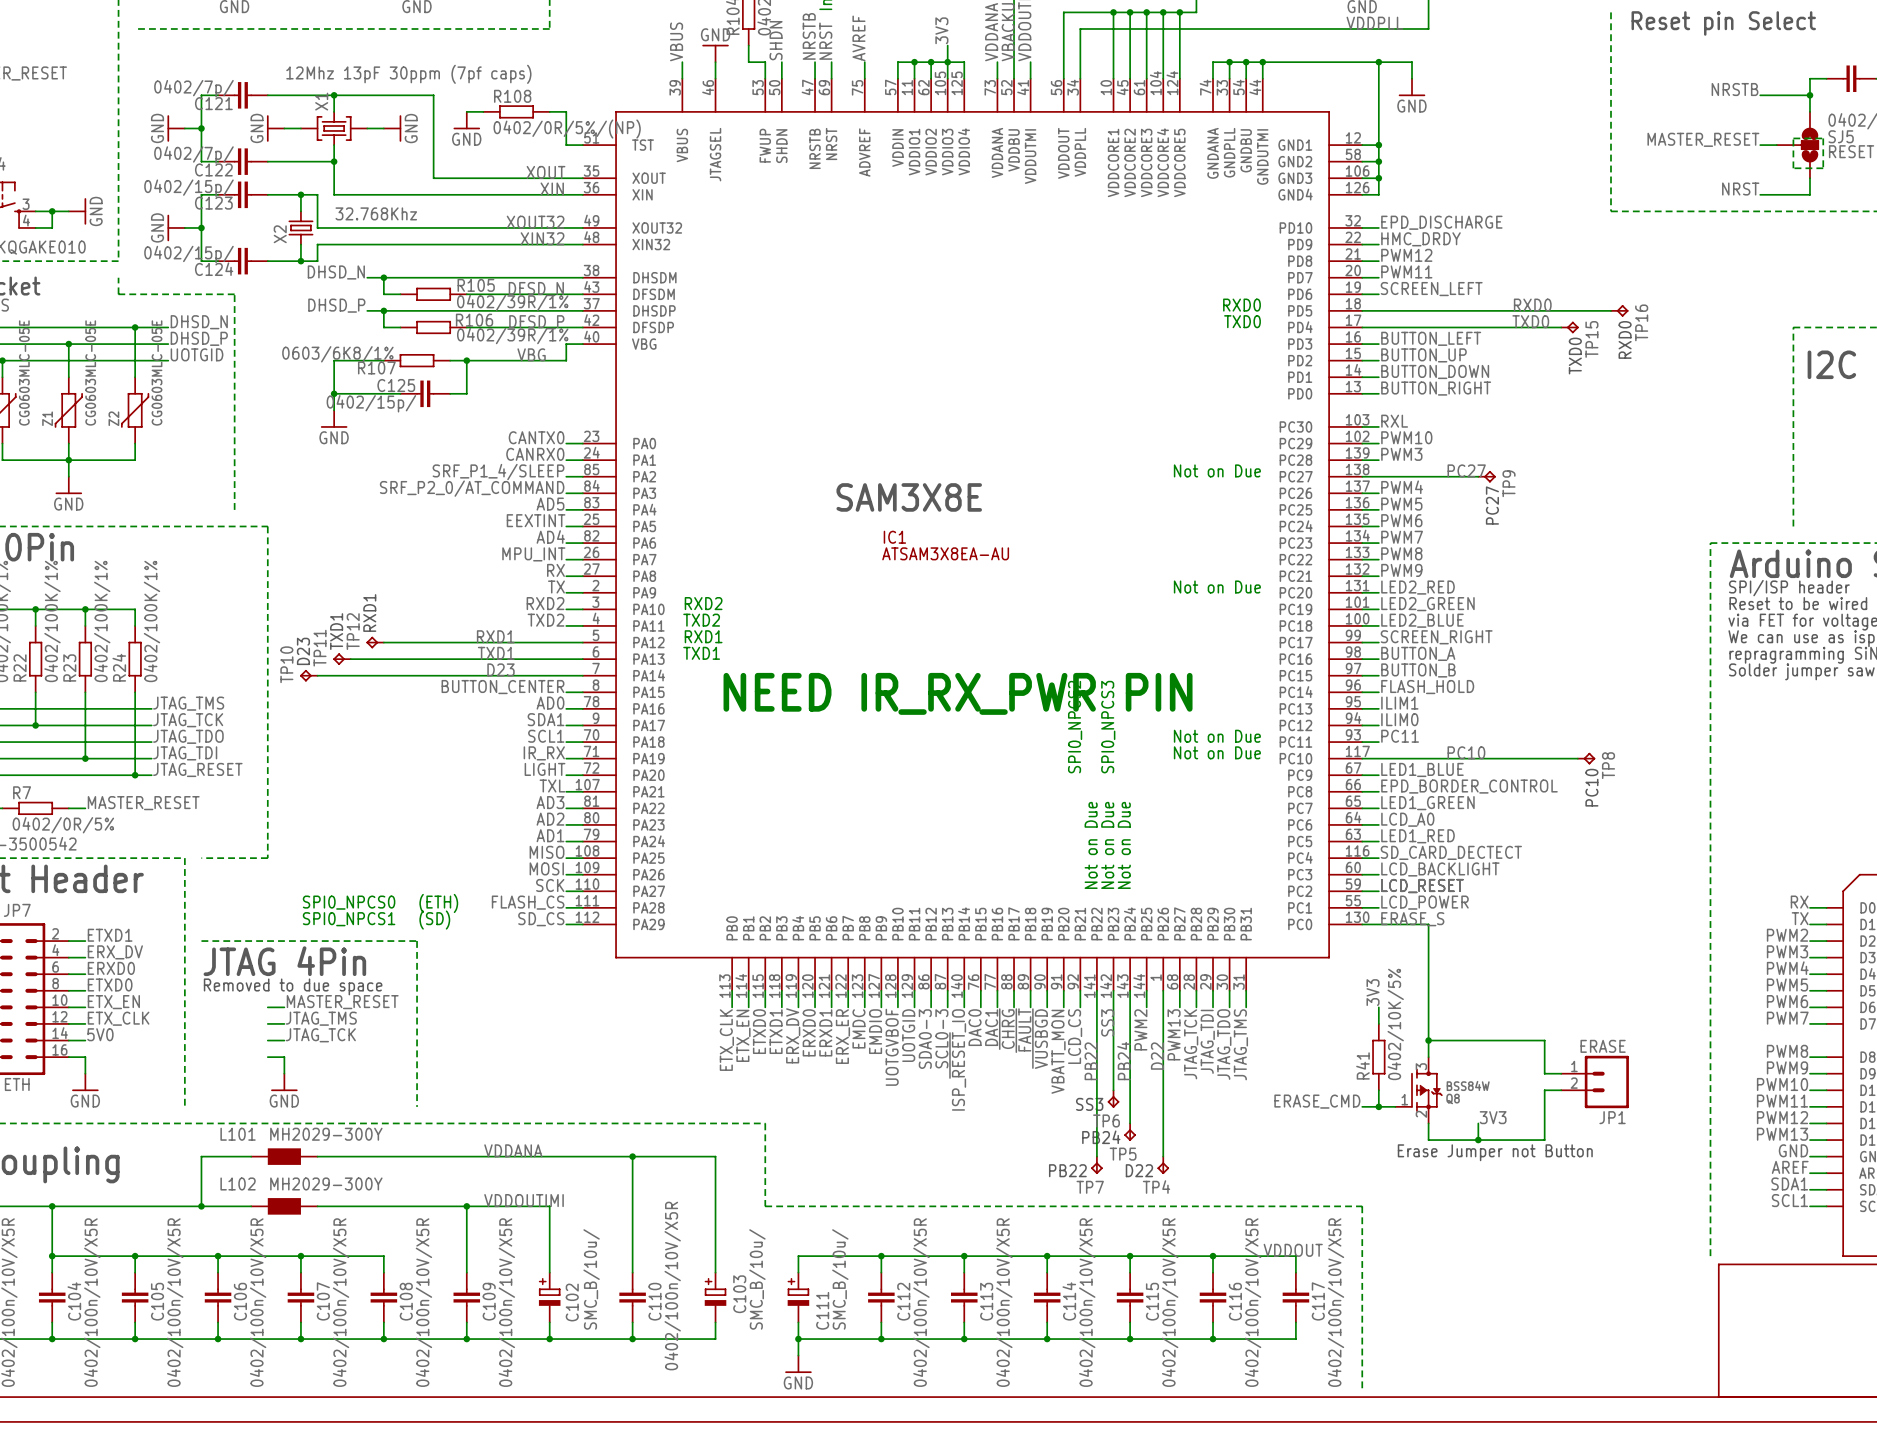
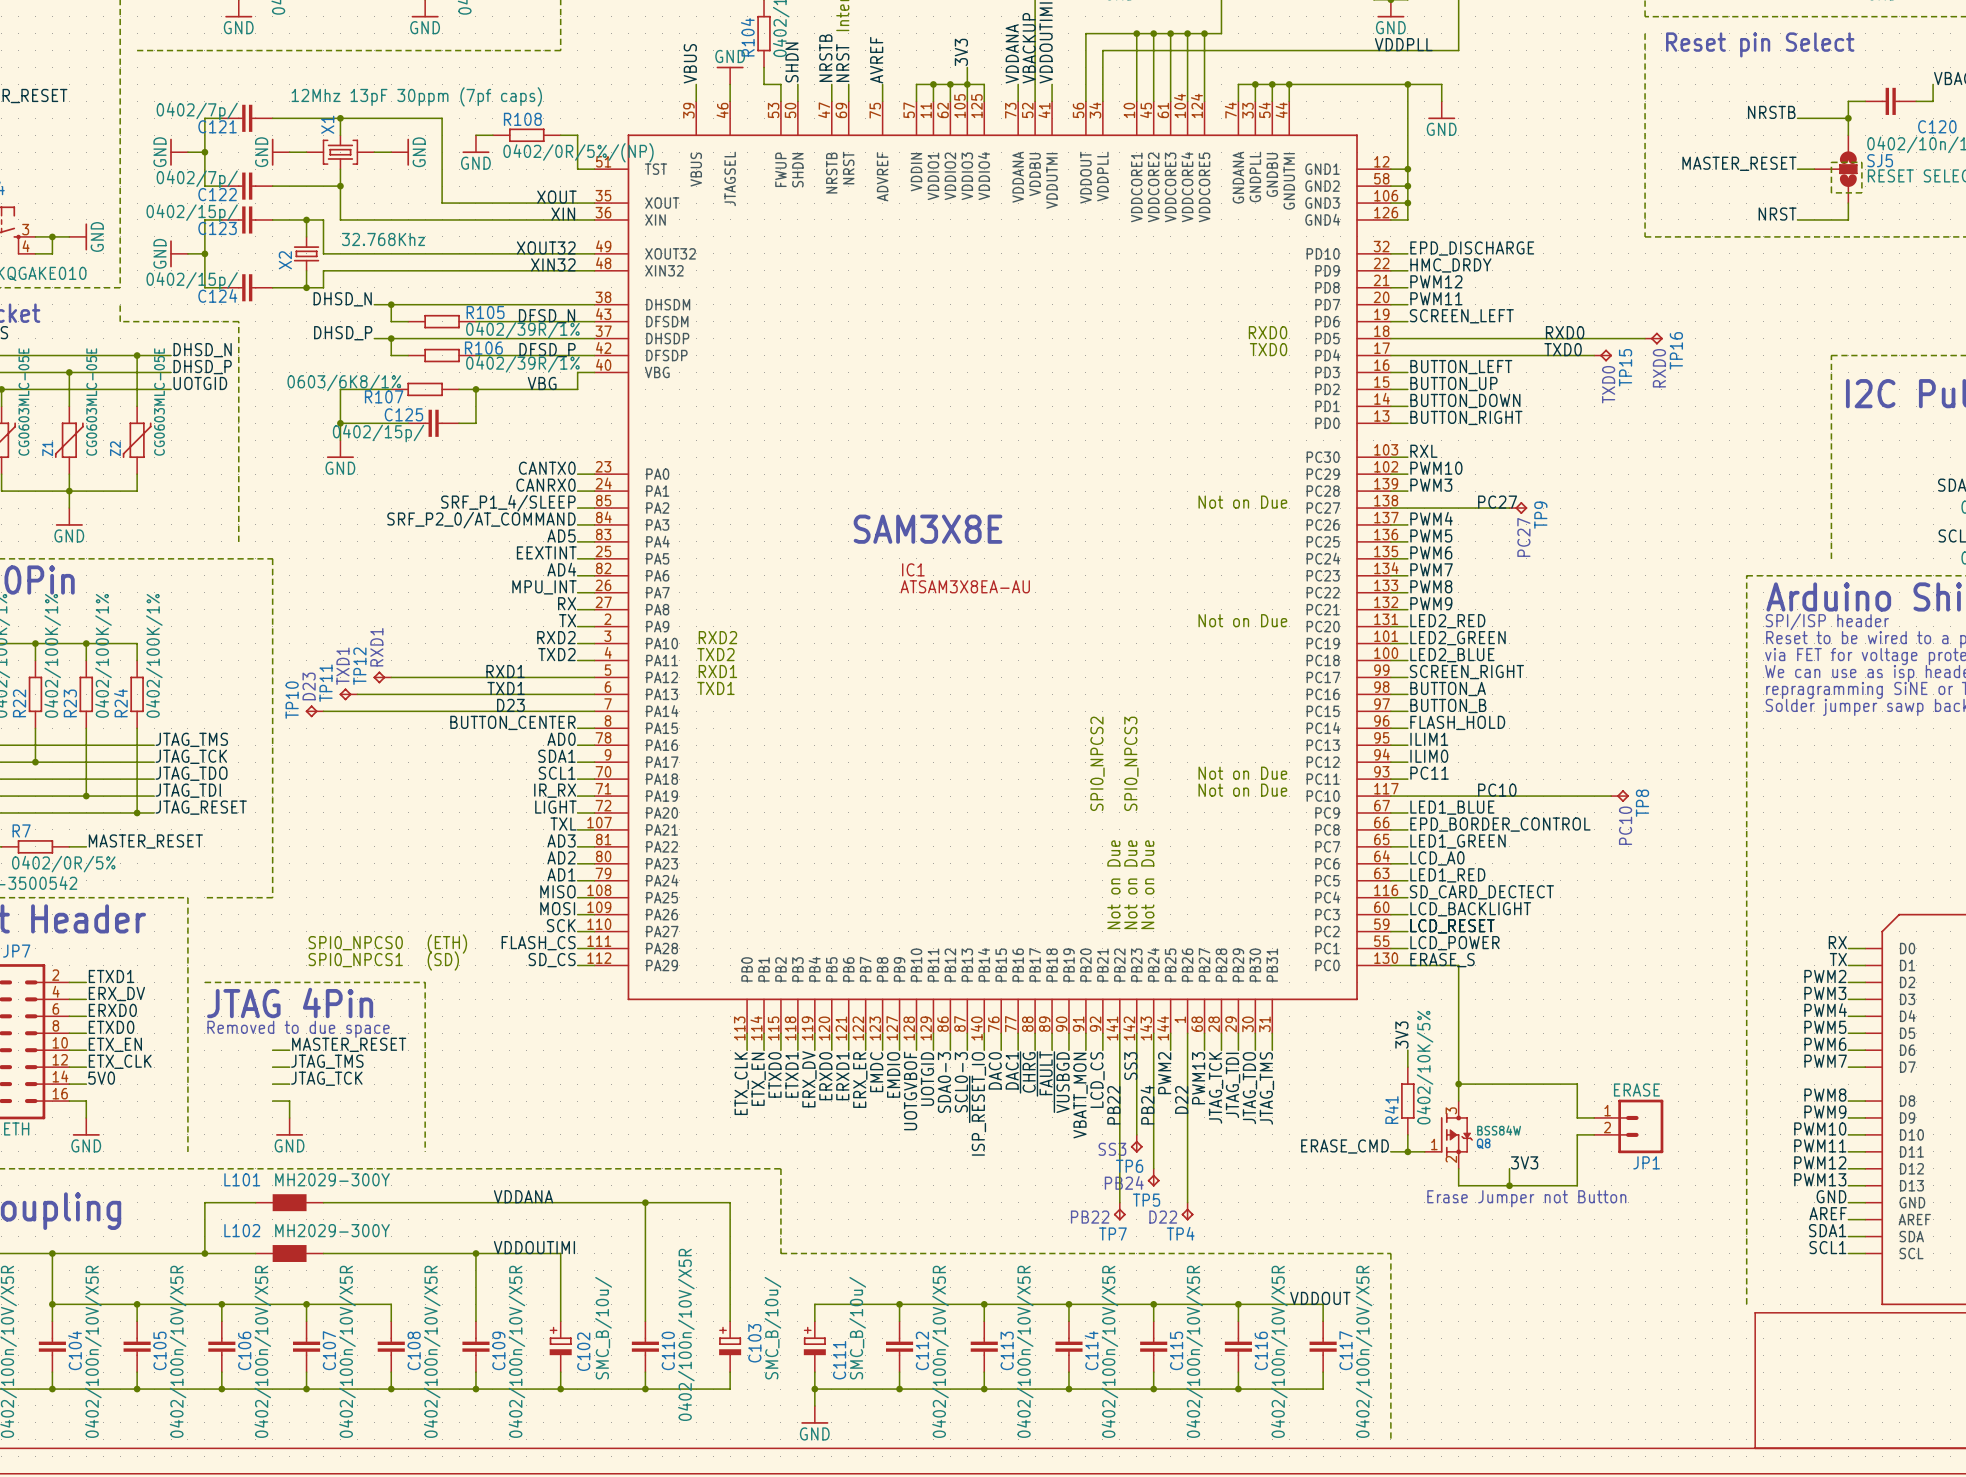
text: NEED IR_RX_PWR PIN (958, 693) -> none

